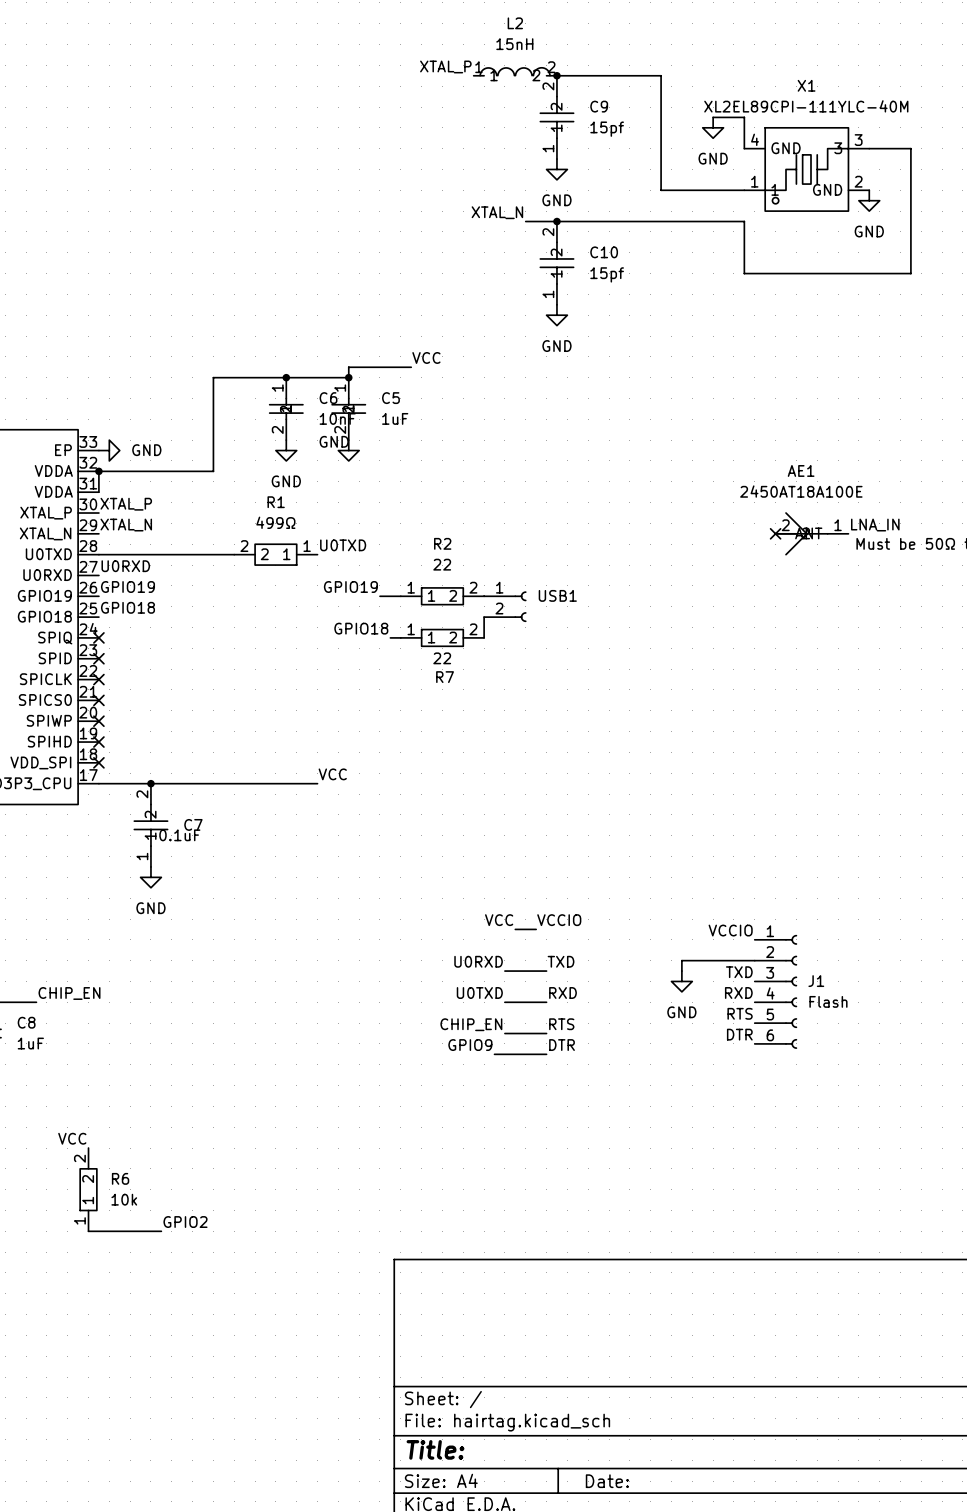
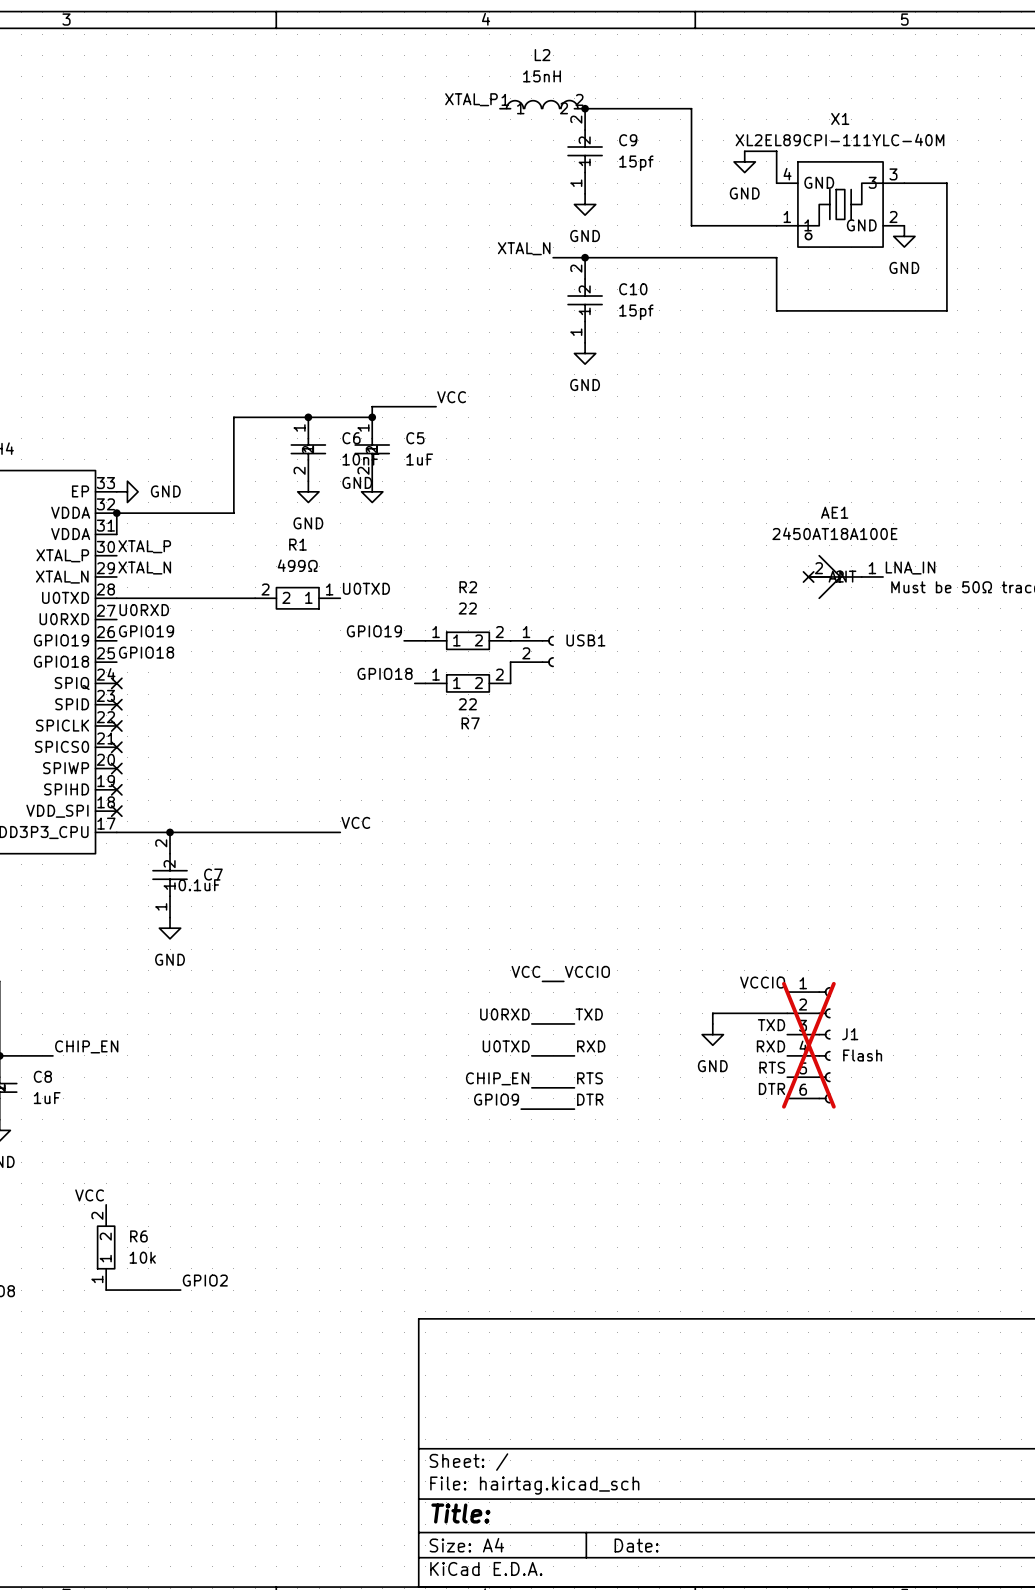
J1 do-not-place cross: none -> (808, 1045)

